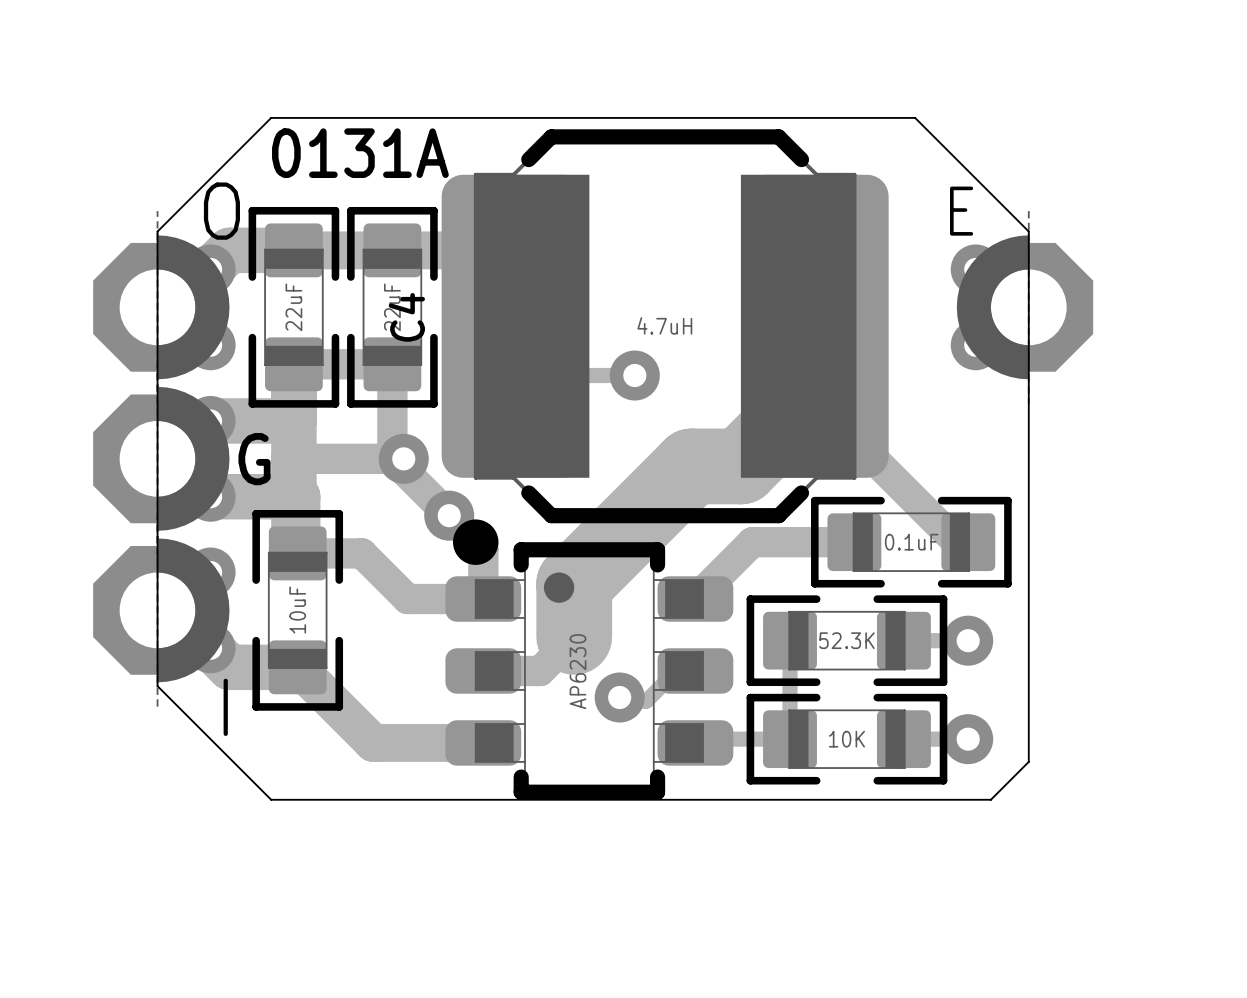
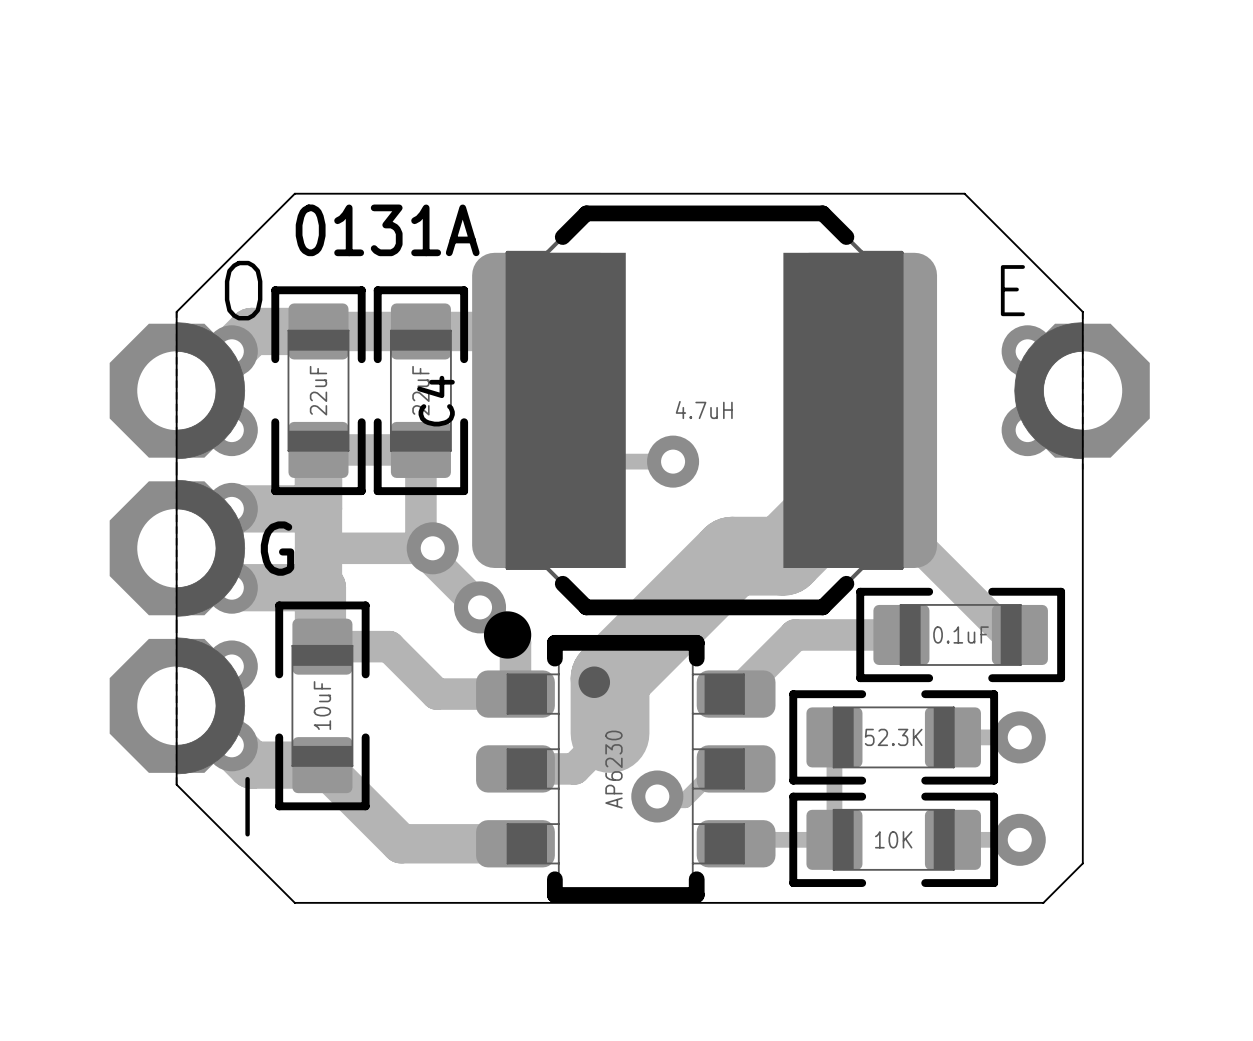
O footprint: [93, 210, 236, 404] -> [109, 311, 258, 470]
E footprint: [950, 210, 1094, 404] -> [1001, 311, 1150, 470]
G footprint: [93, 362, 236, 556] -> [109, 469, 258, 628]
I footprint: [93, 513, 236, 707] -> [109, 626, 258, 786]

